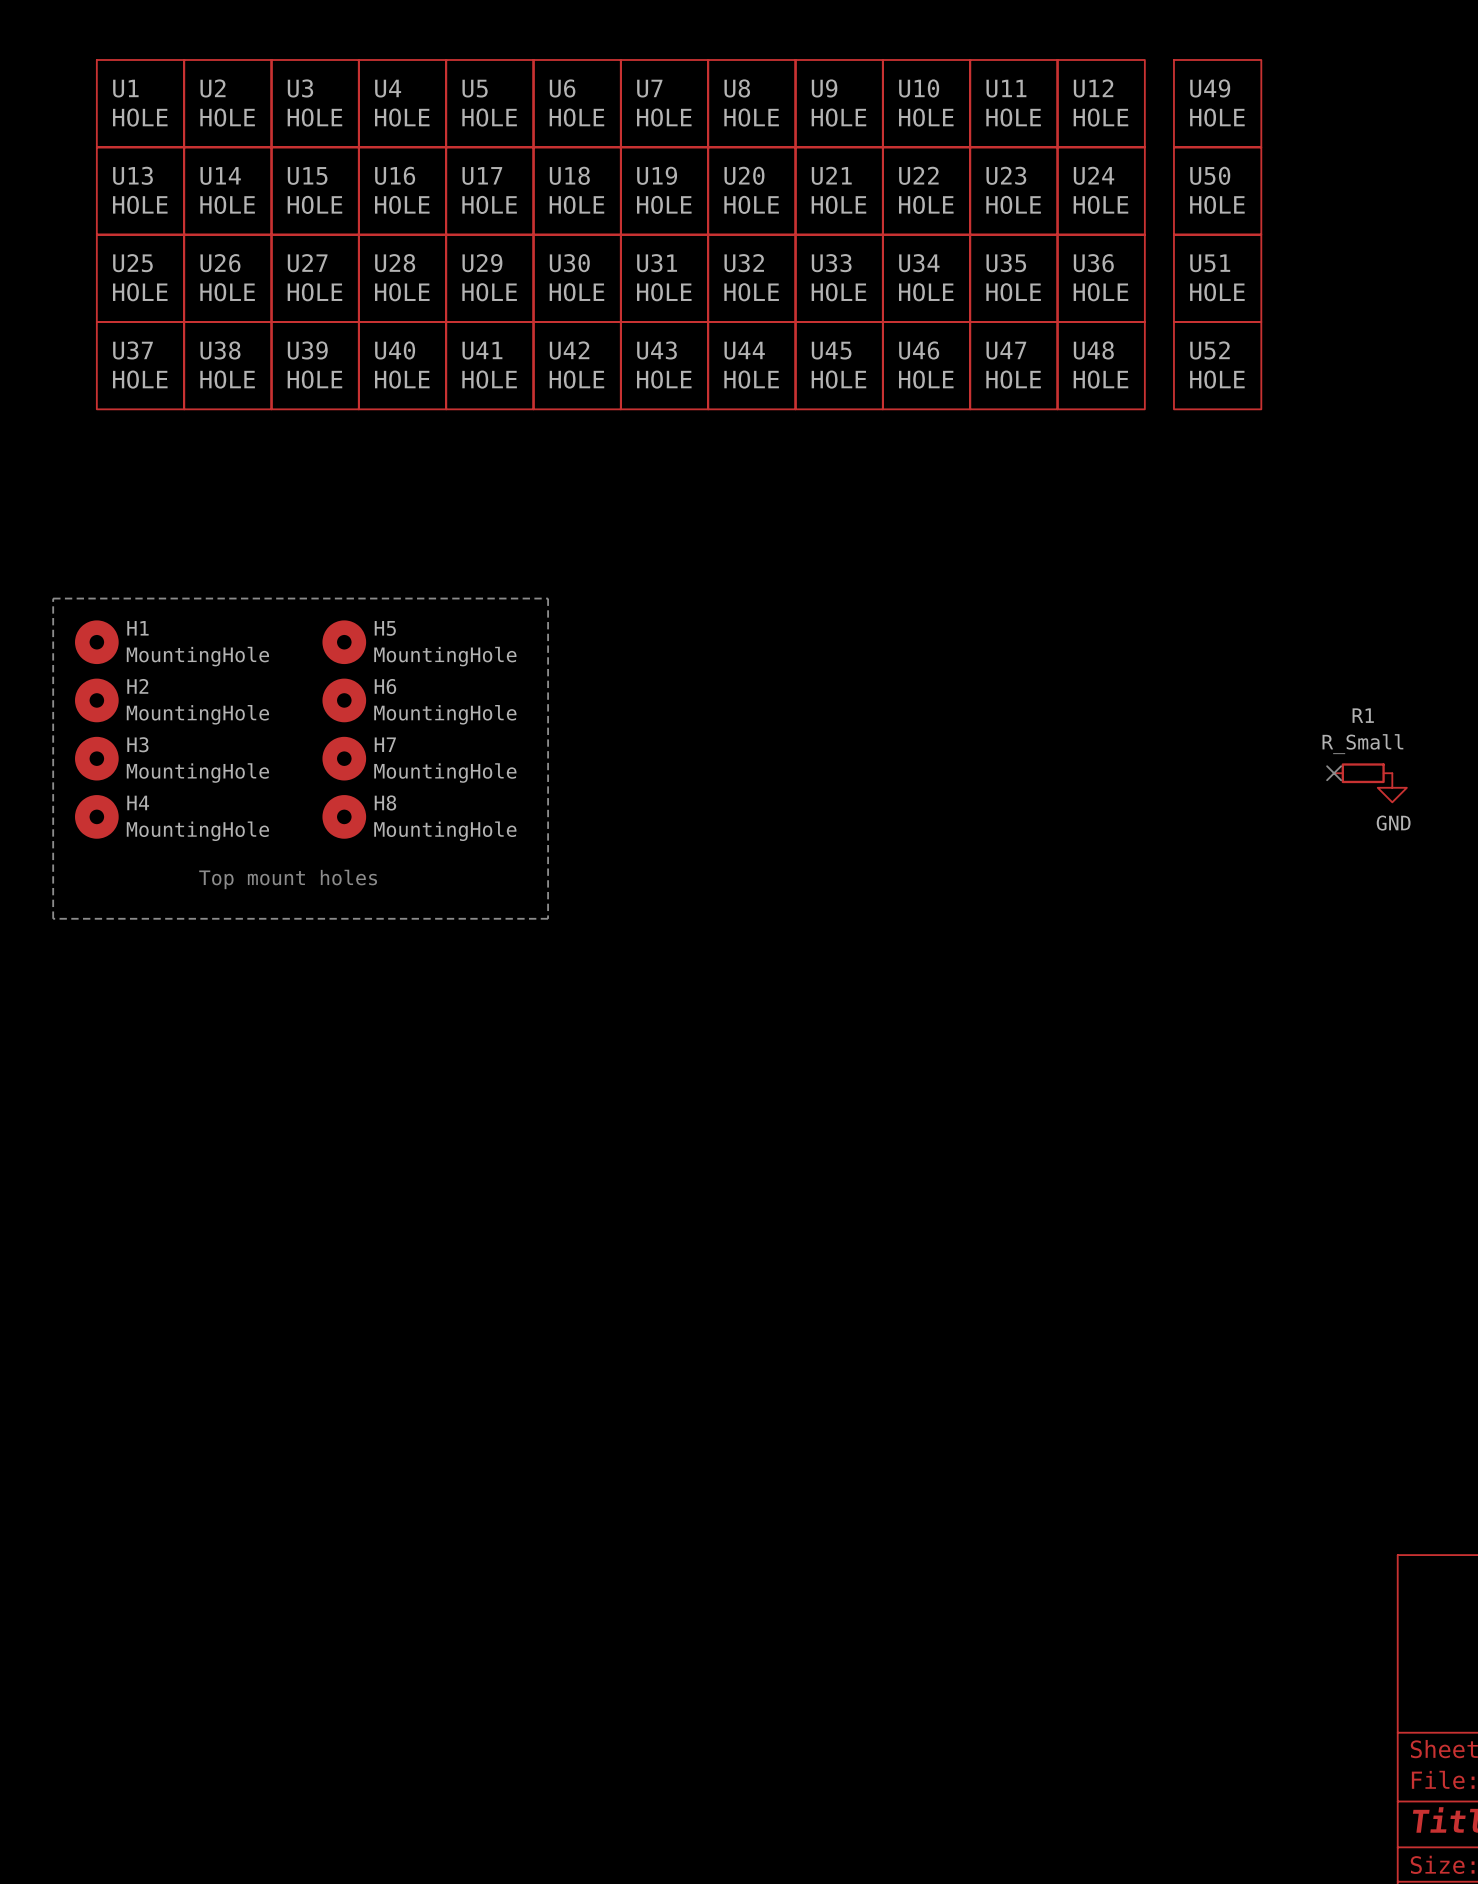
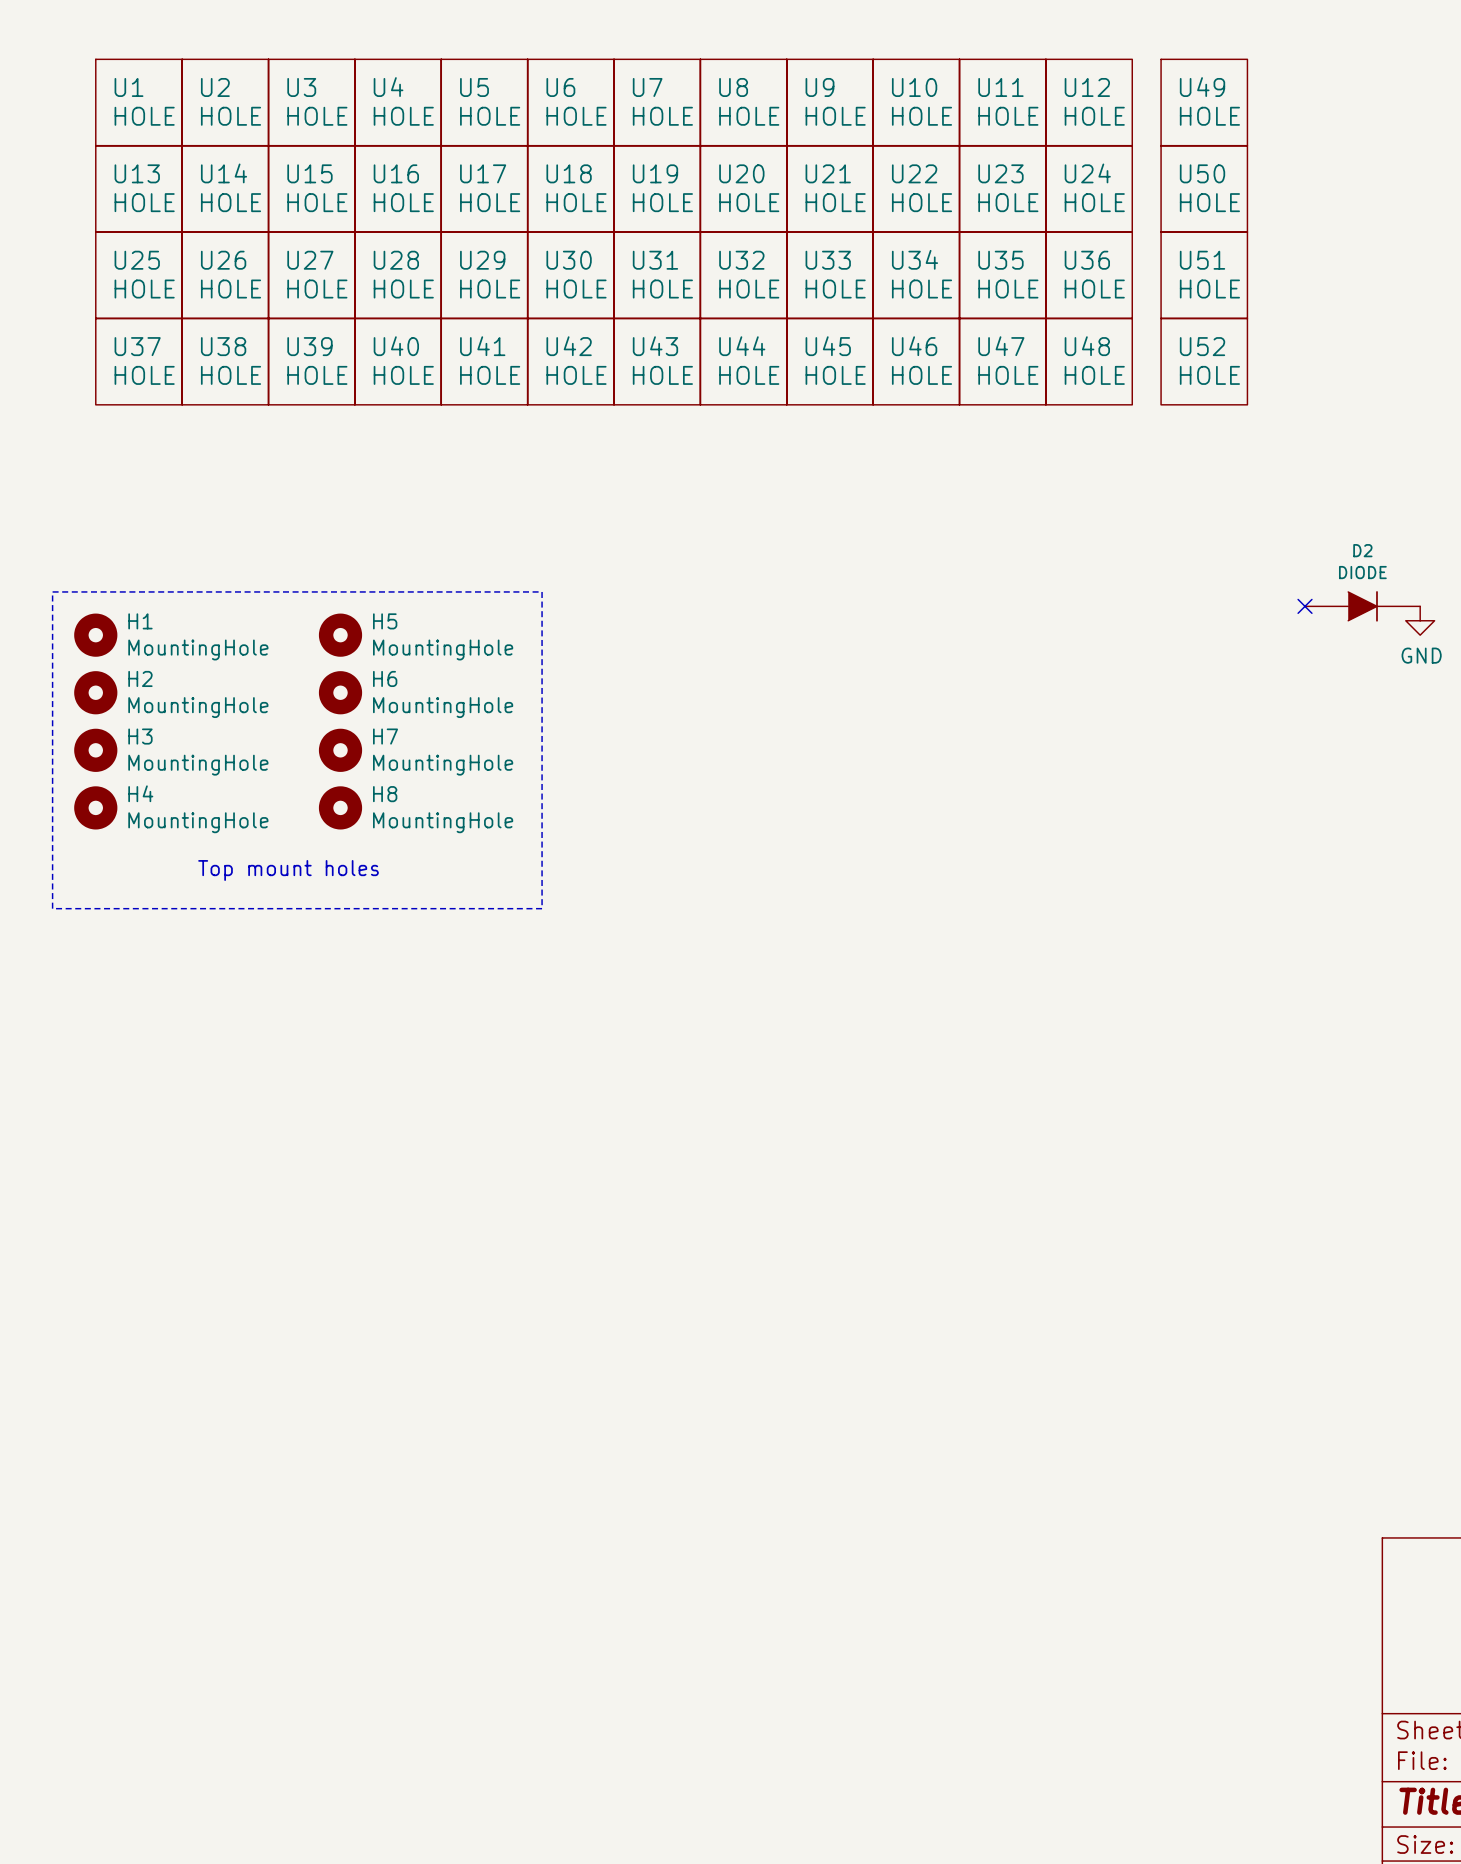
no-connect mark: none -> (1305, 606)
D2: none -> DIODE (1362, 606)
no-connect mark: (1334, 773) -> none
R1: R_Small (1363, 773) -> none
power symbol position: GND (1392, 787) -> GND (1420, 620)

